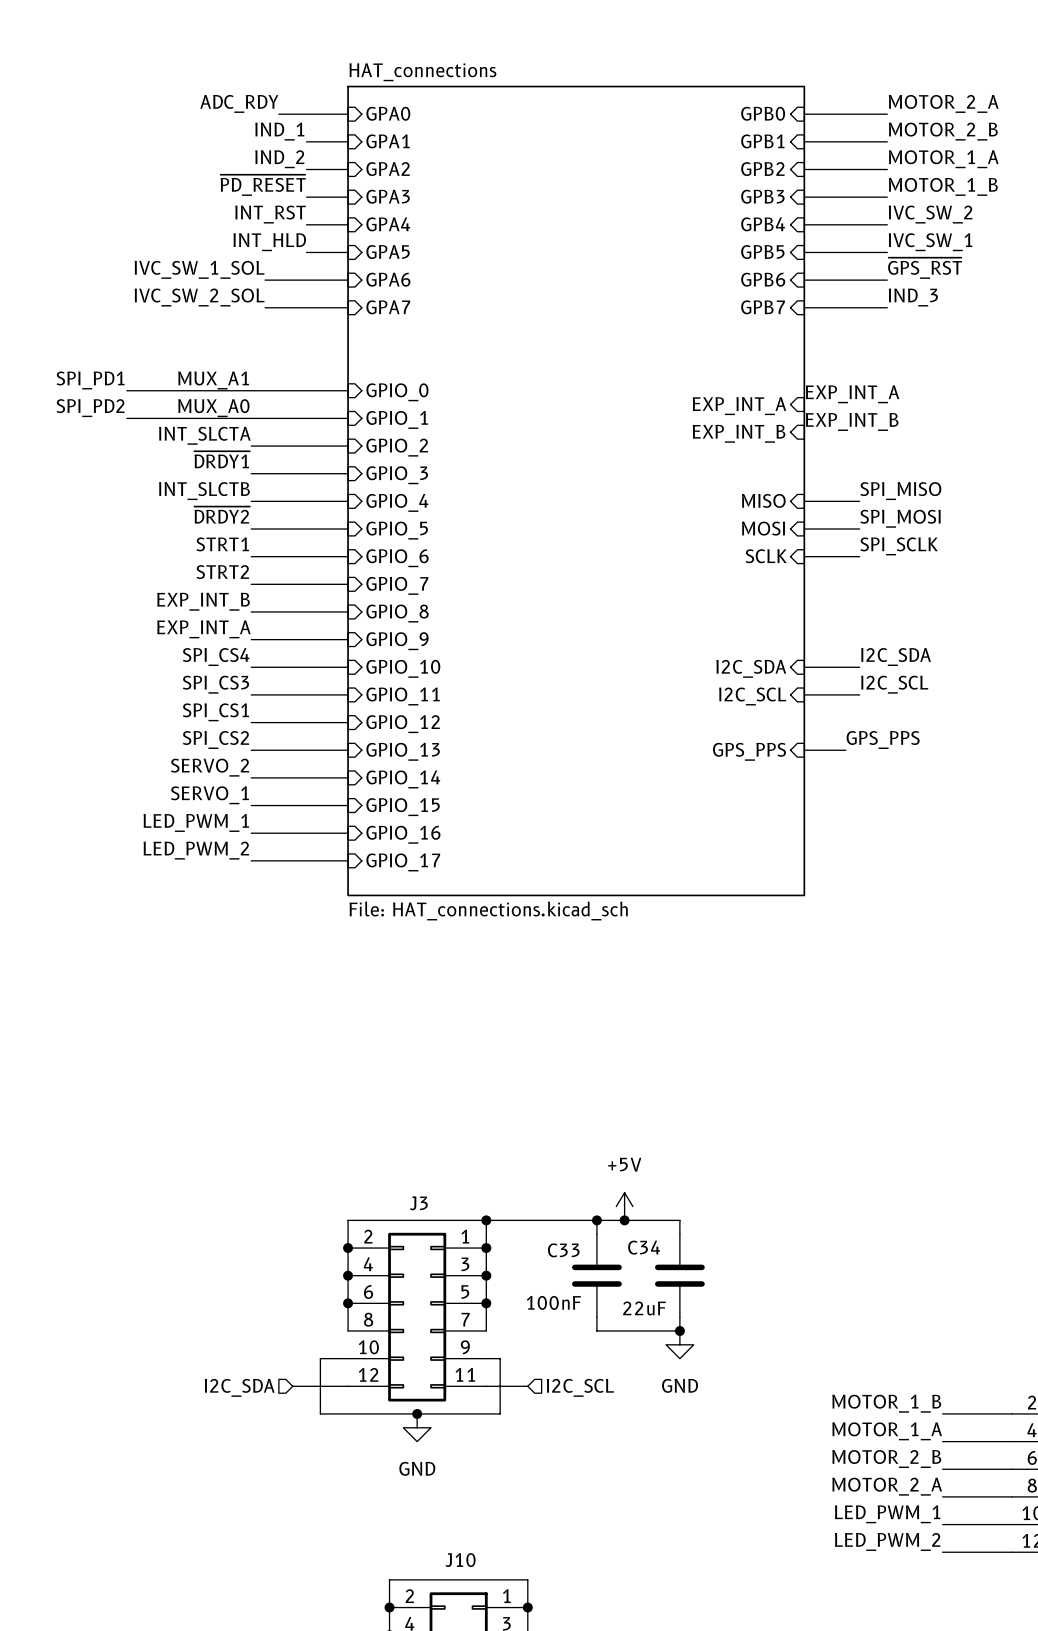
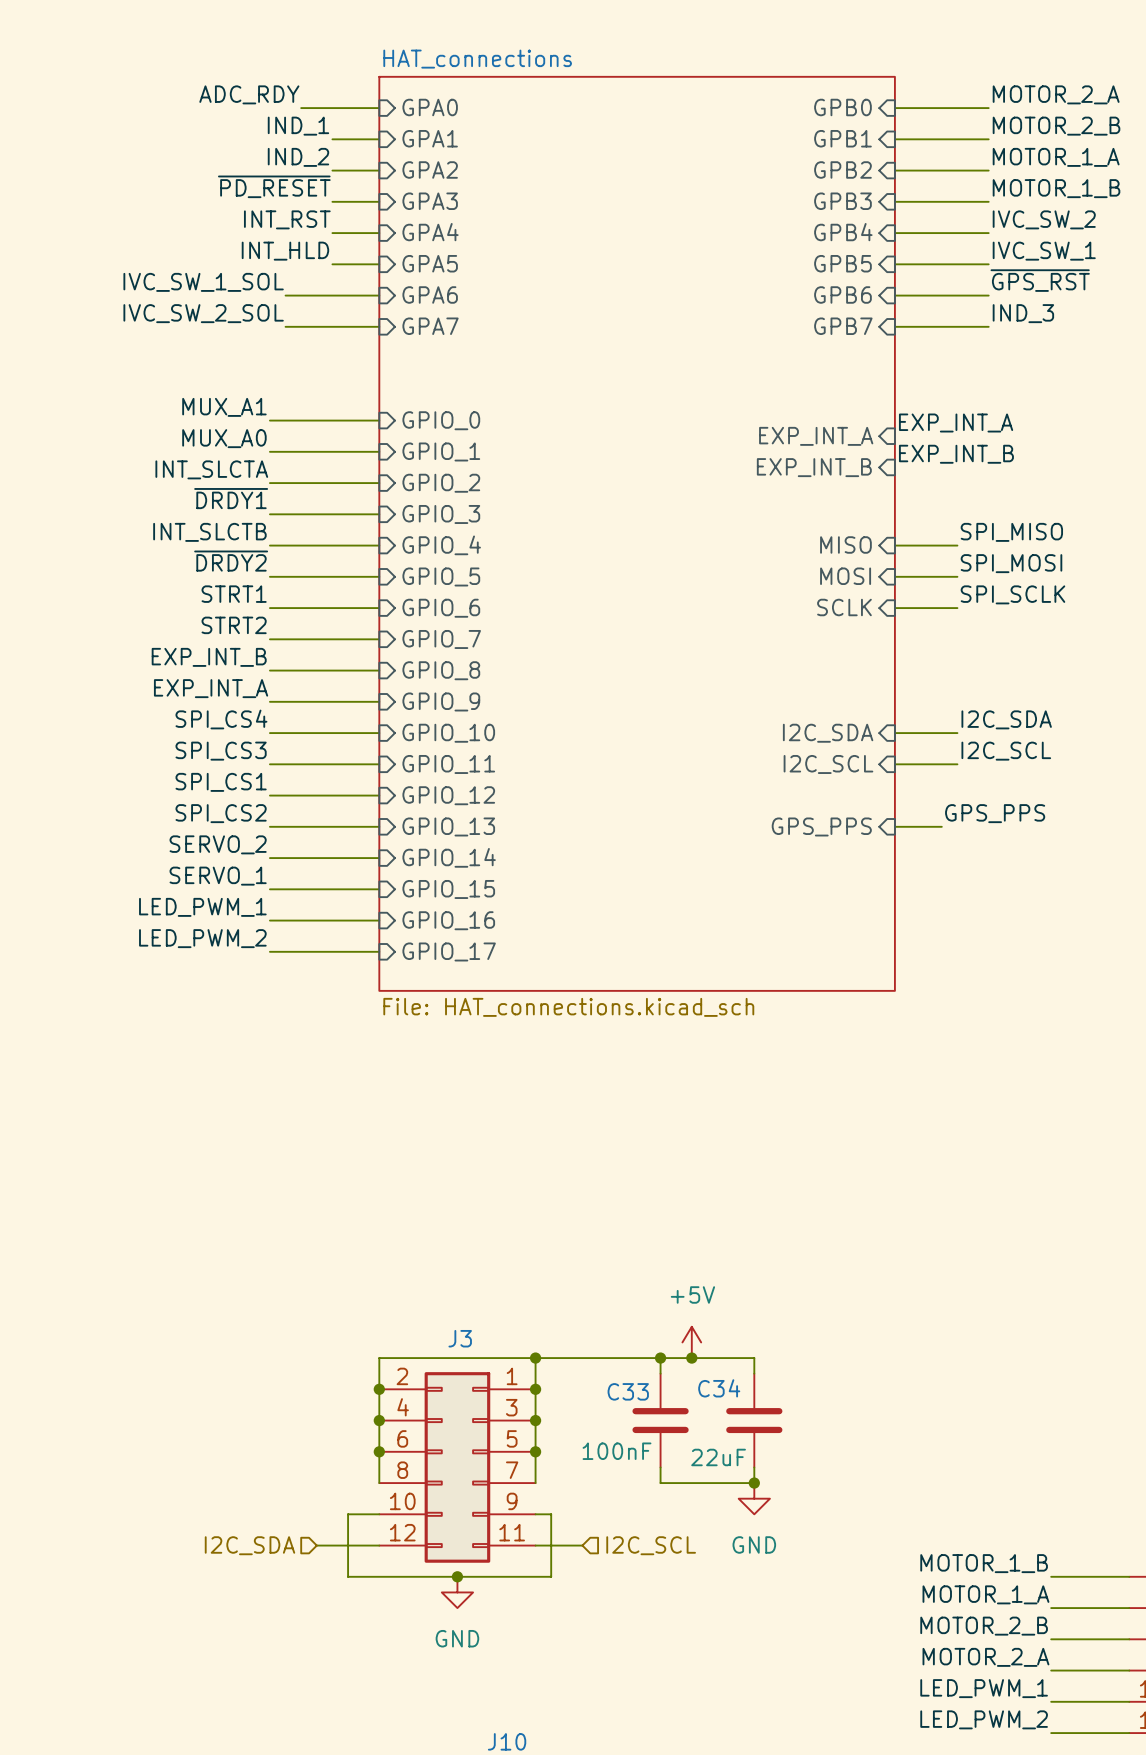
label: SPI_PD1 (90, 380) -> none
wire: (126, 390) (251, 390) -> none
label: SPI_PD2 (90, 408) -> none
wire: (126, 418) (251, 418) -> none

